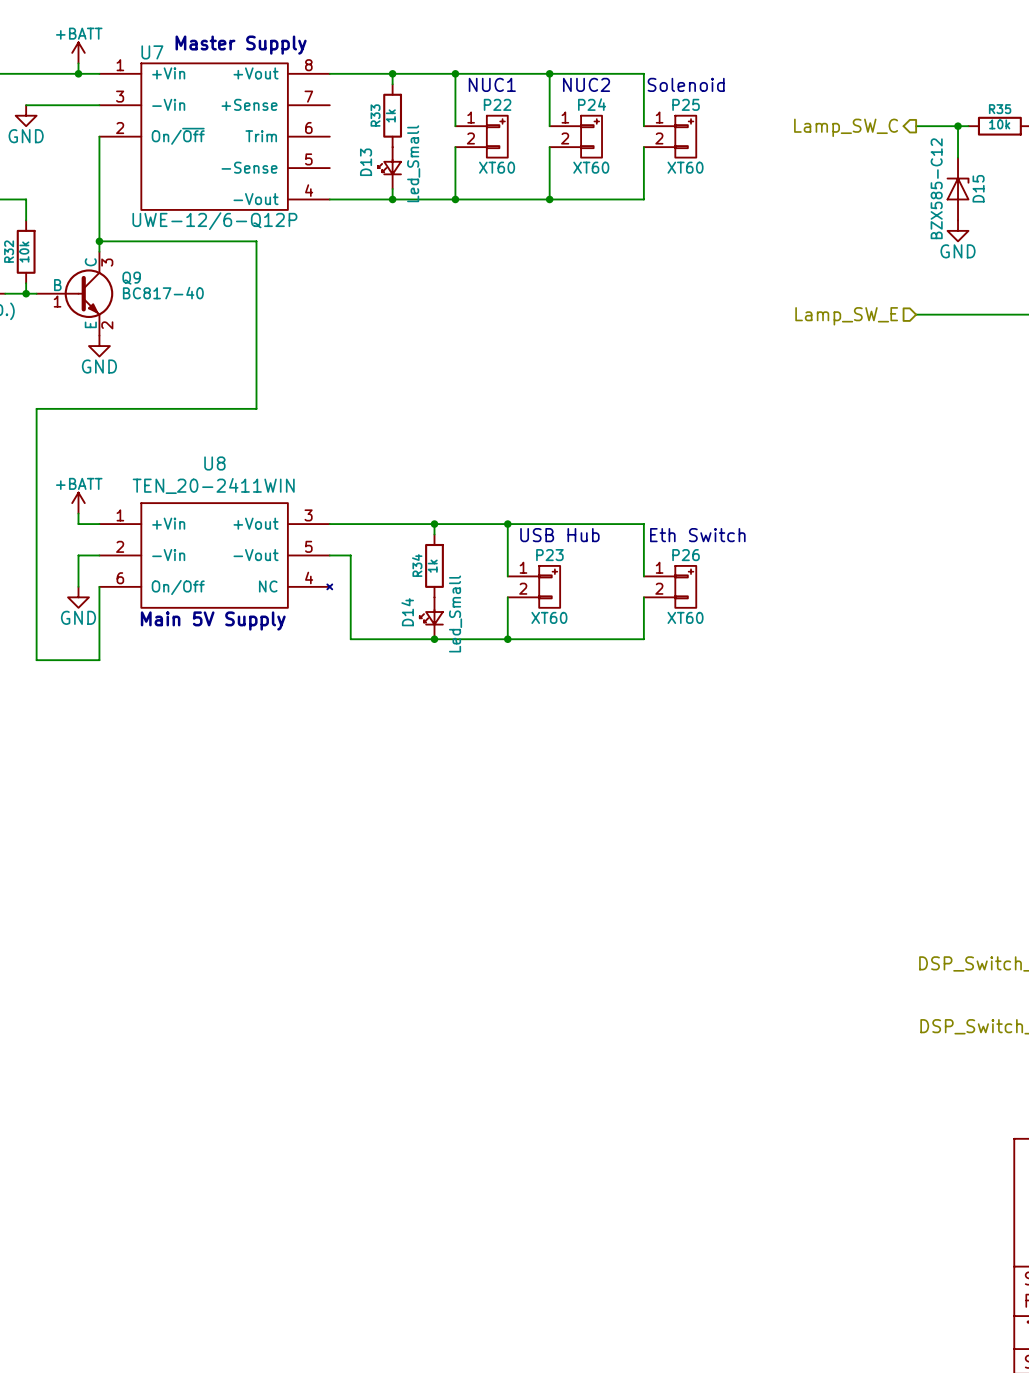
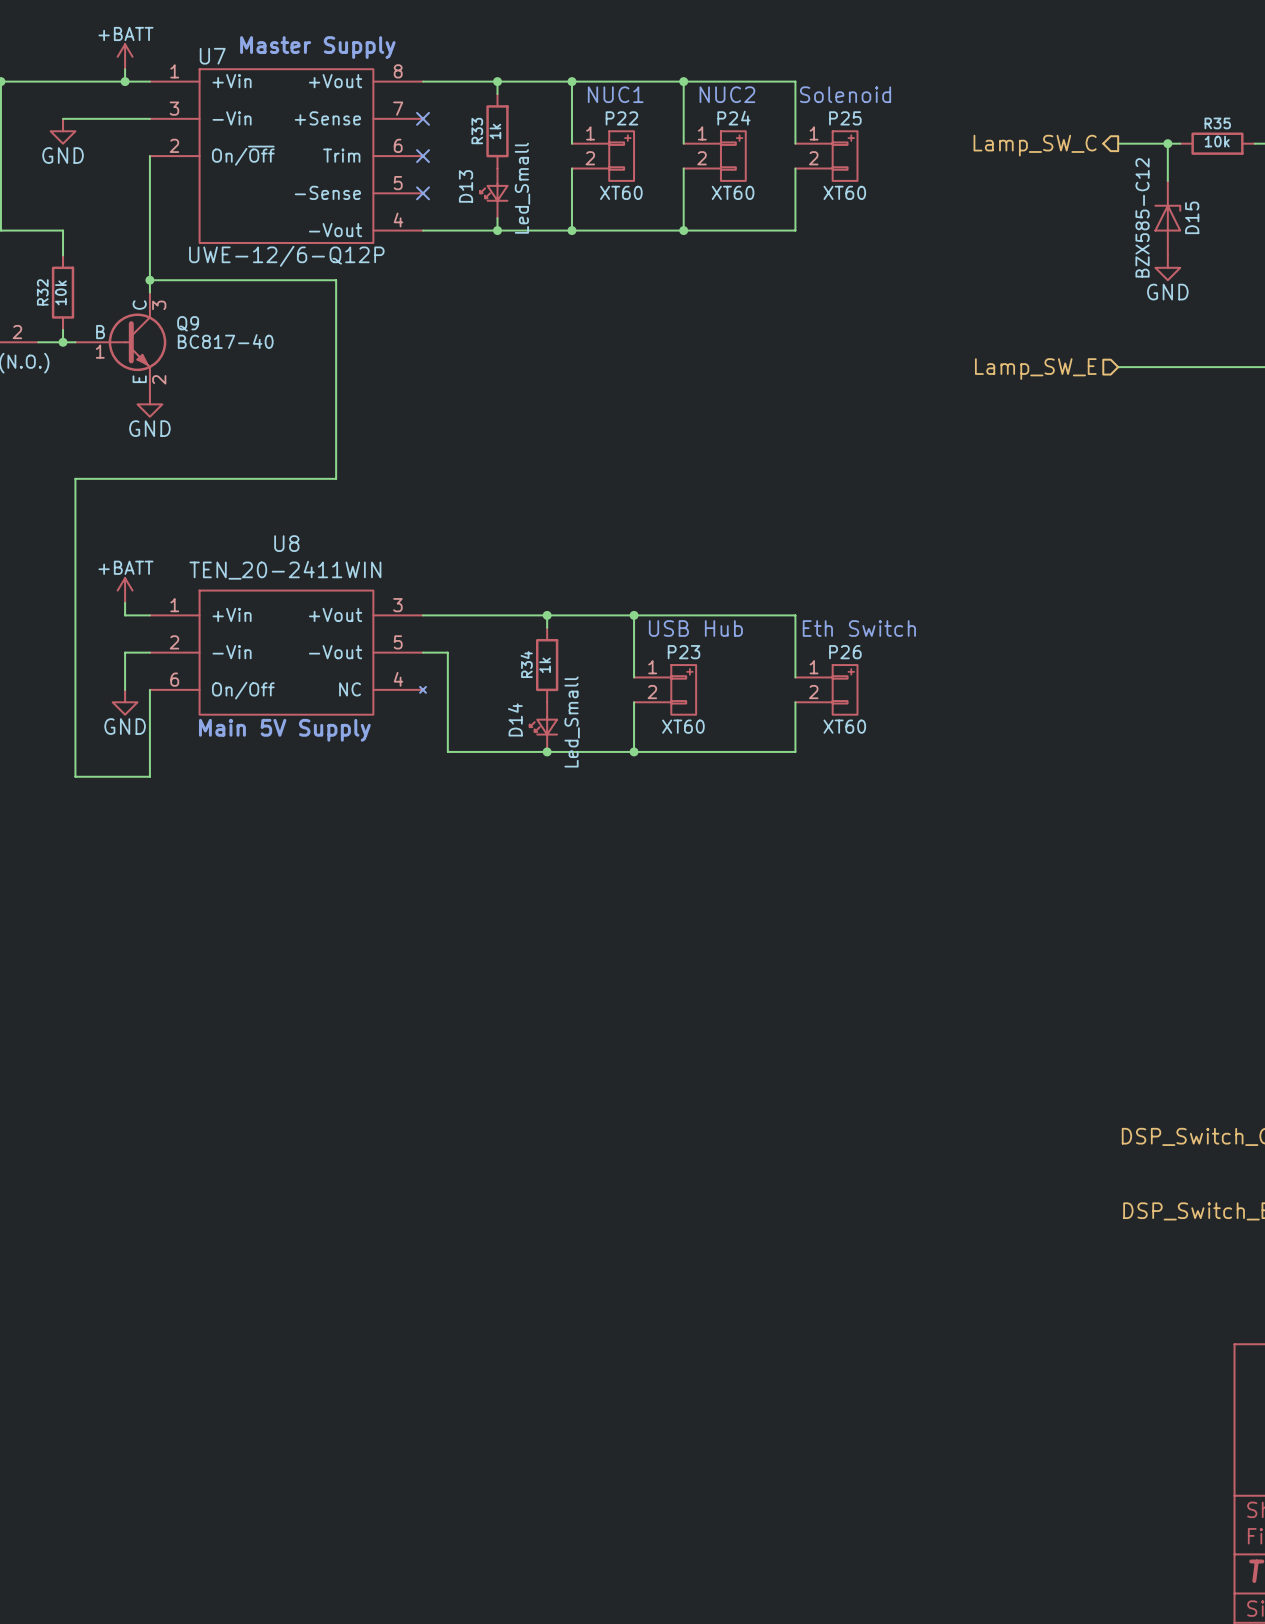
no-connect mark: none -> (423, 118)
no-connect mark: none -> (423, 156)
no-connect mark: none -> (423, 193)

